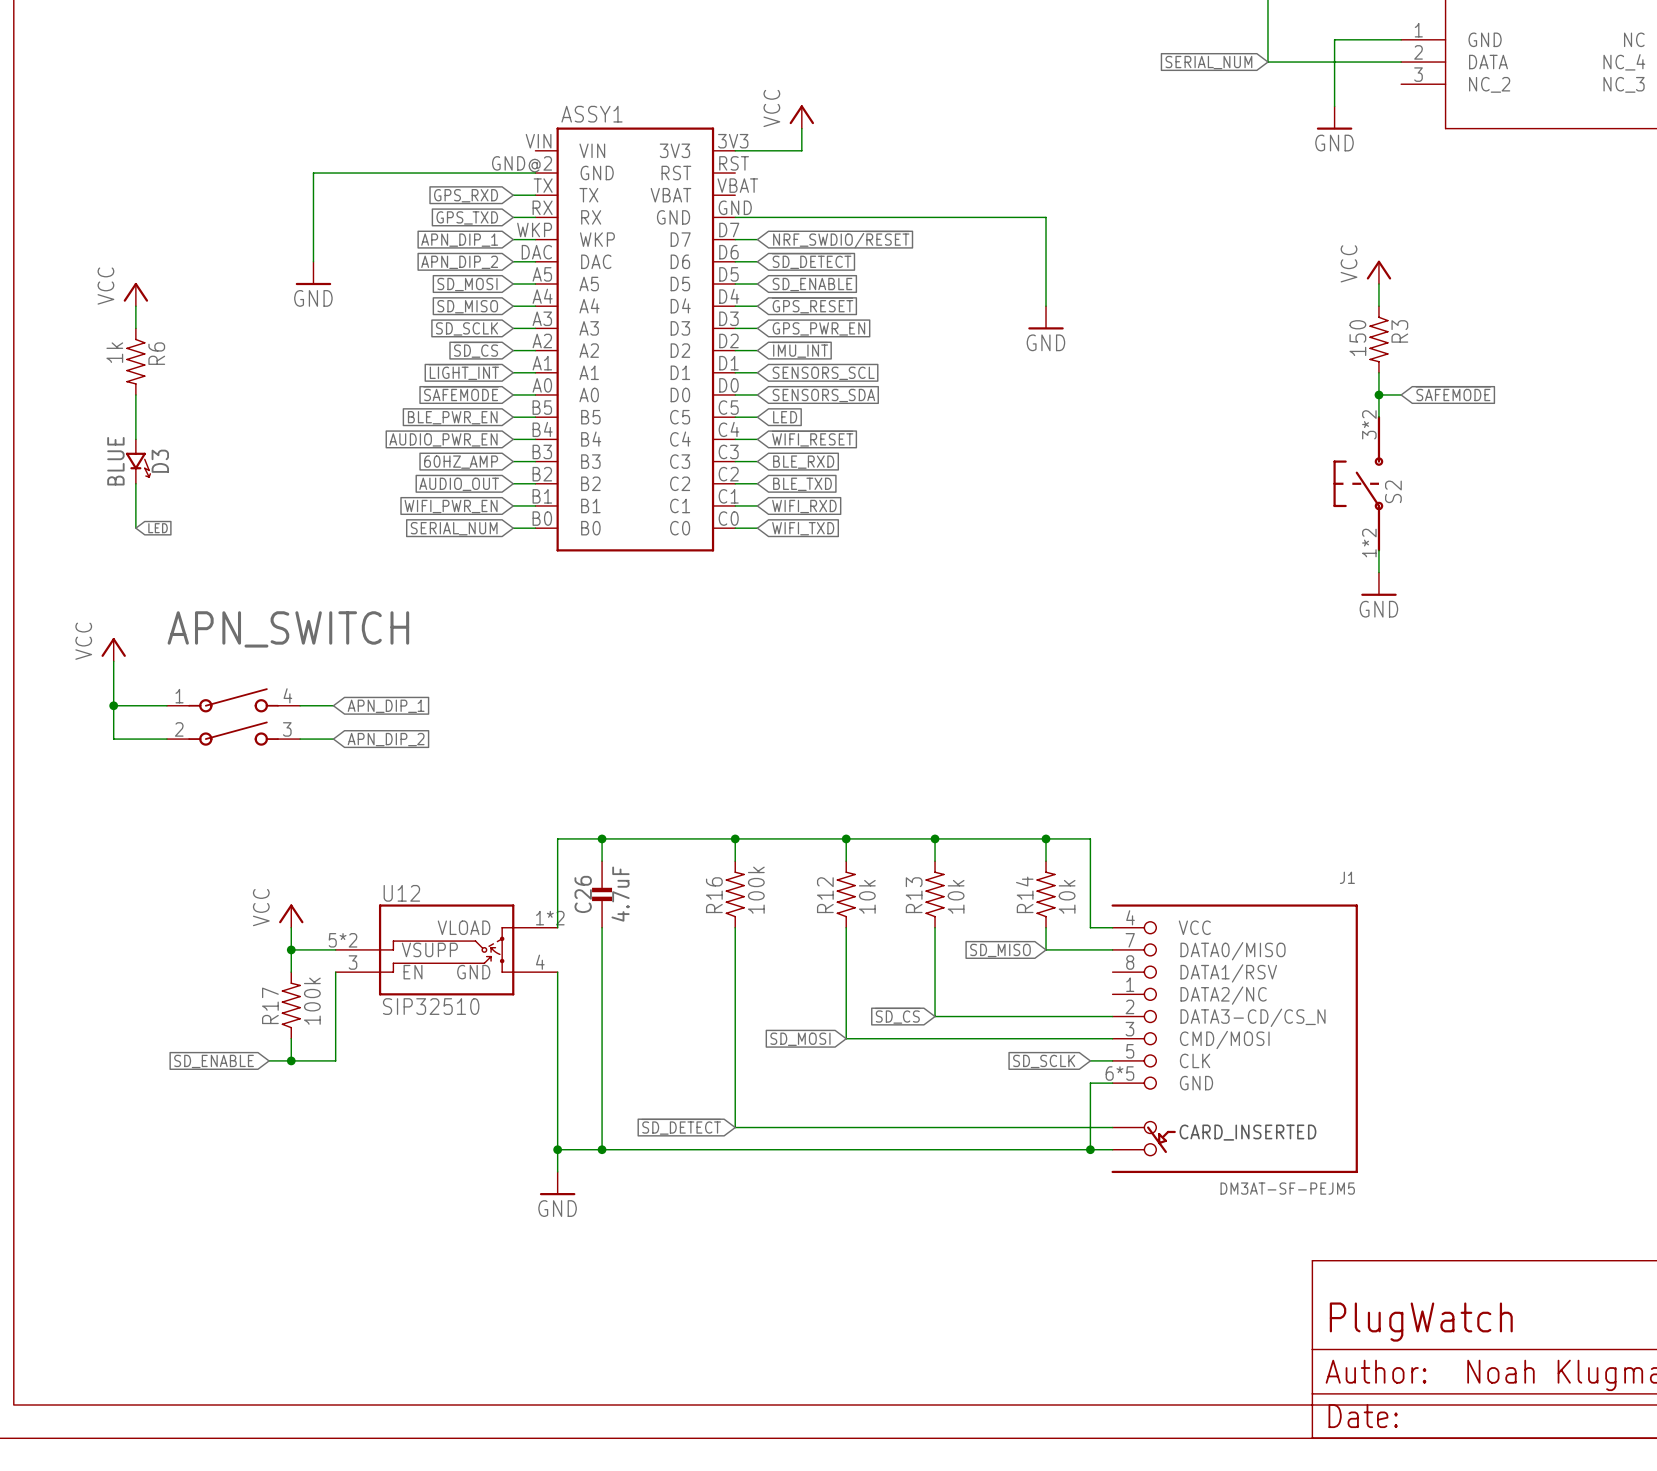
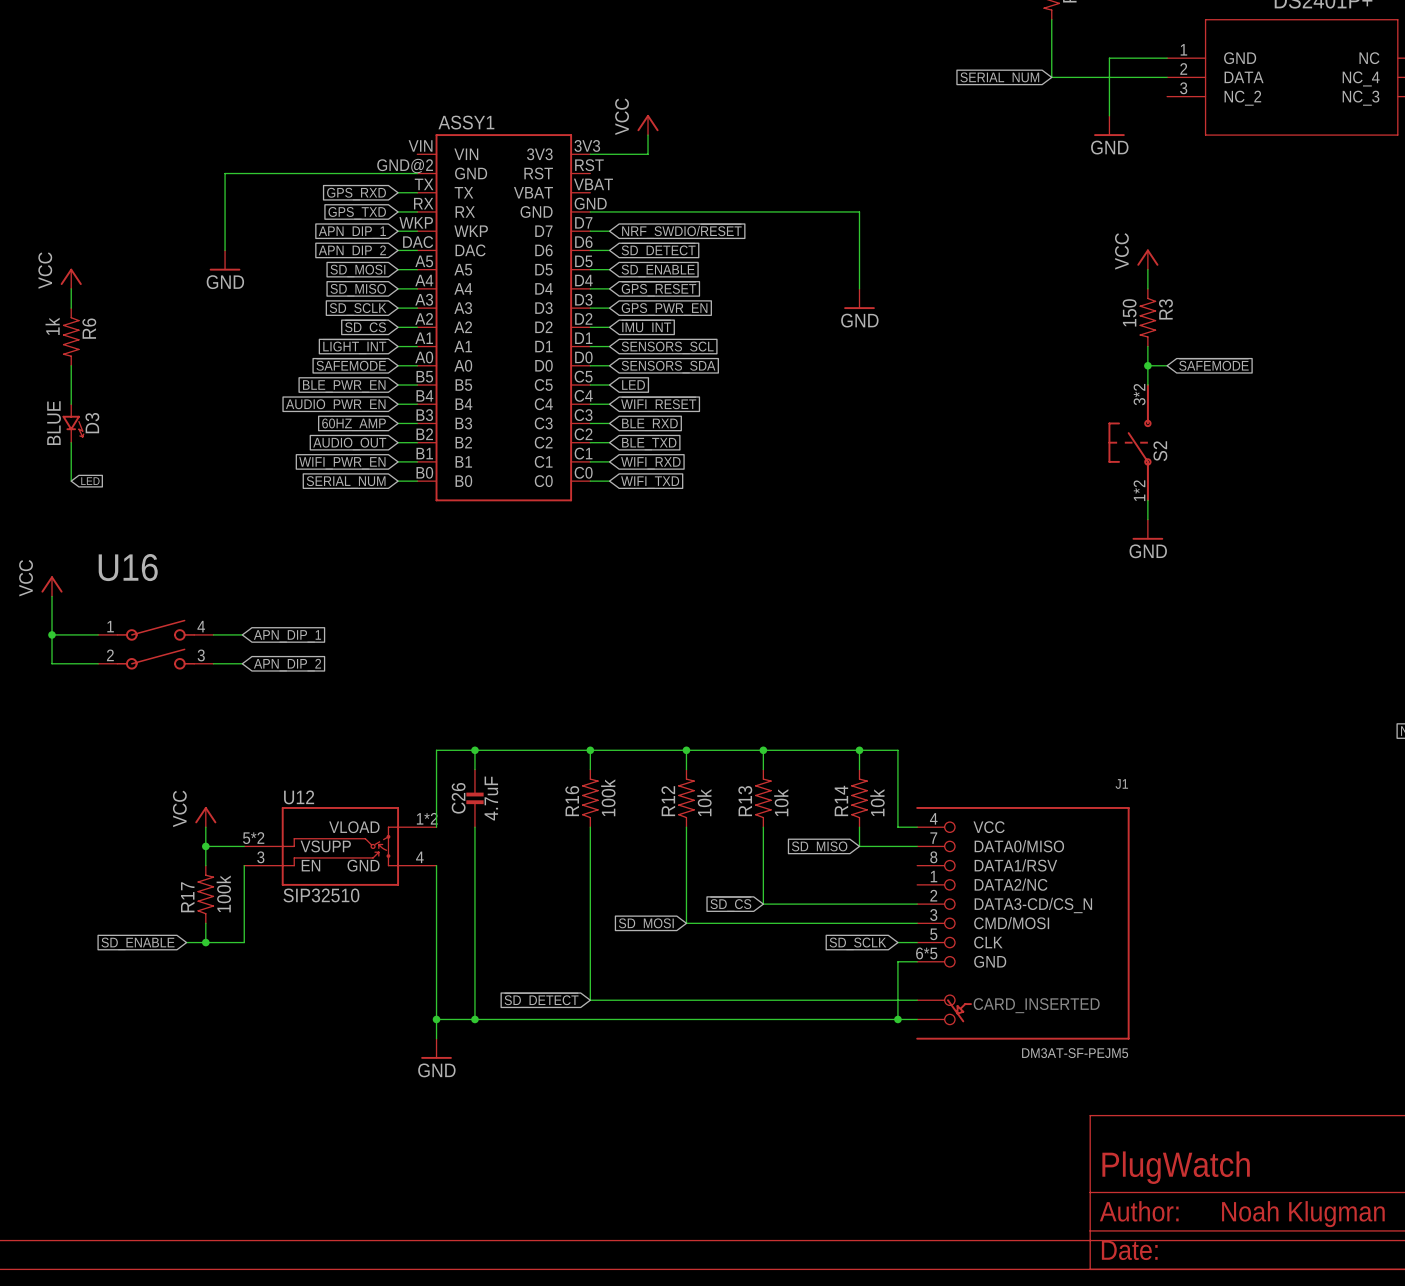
APN_SWITCH name: APN_SWITCH (288, 629) -> U16 (128, 567)

